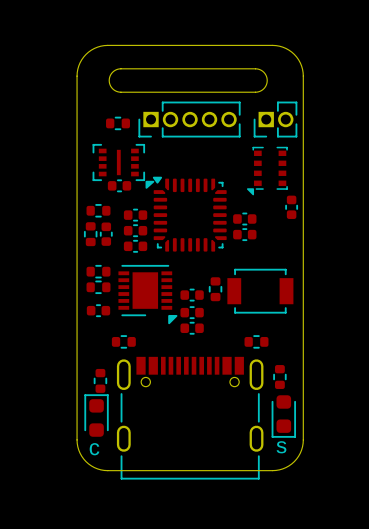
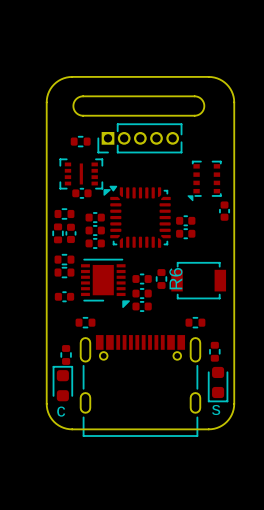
part: (275, 119) -> none
part: none -> (64, 259)
part: (98, 271) -> none
part: none -> (64, 272)
part: (98, 287) -> none
R6 name: none -> R6 (175, 278)
part: none -> (142, 279)
part: (192, 295) -> none
part: none -> (142, 293)
part: (192, 312) -> none
part: none -> (142, 306)
part: (192, 328) -> none

